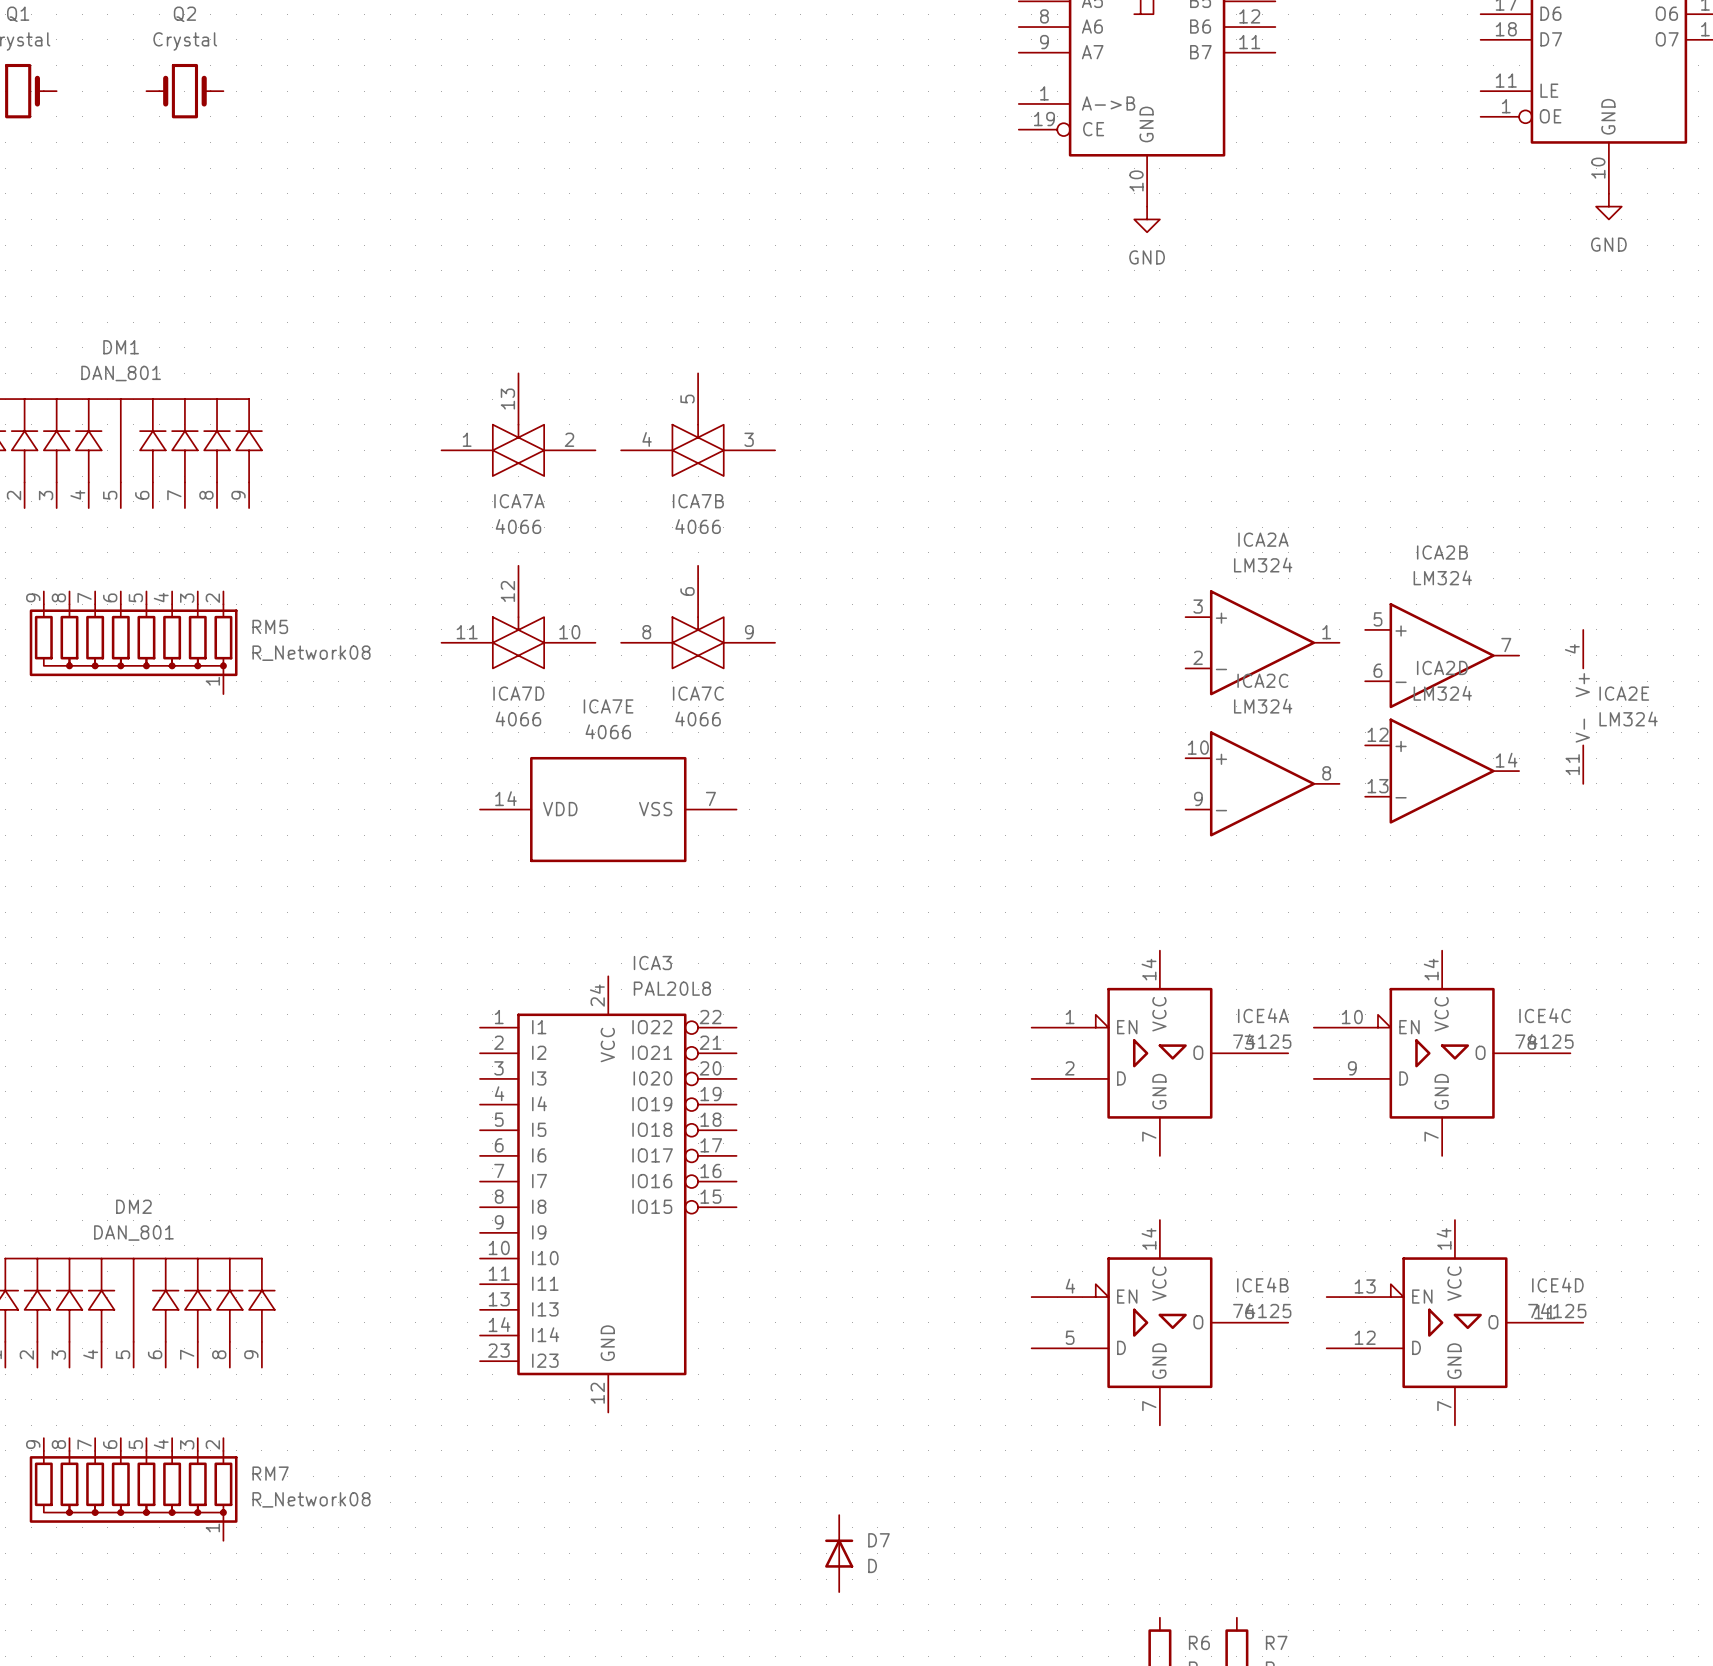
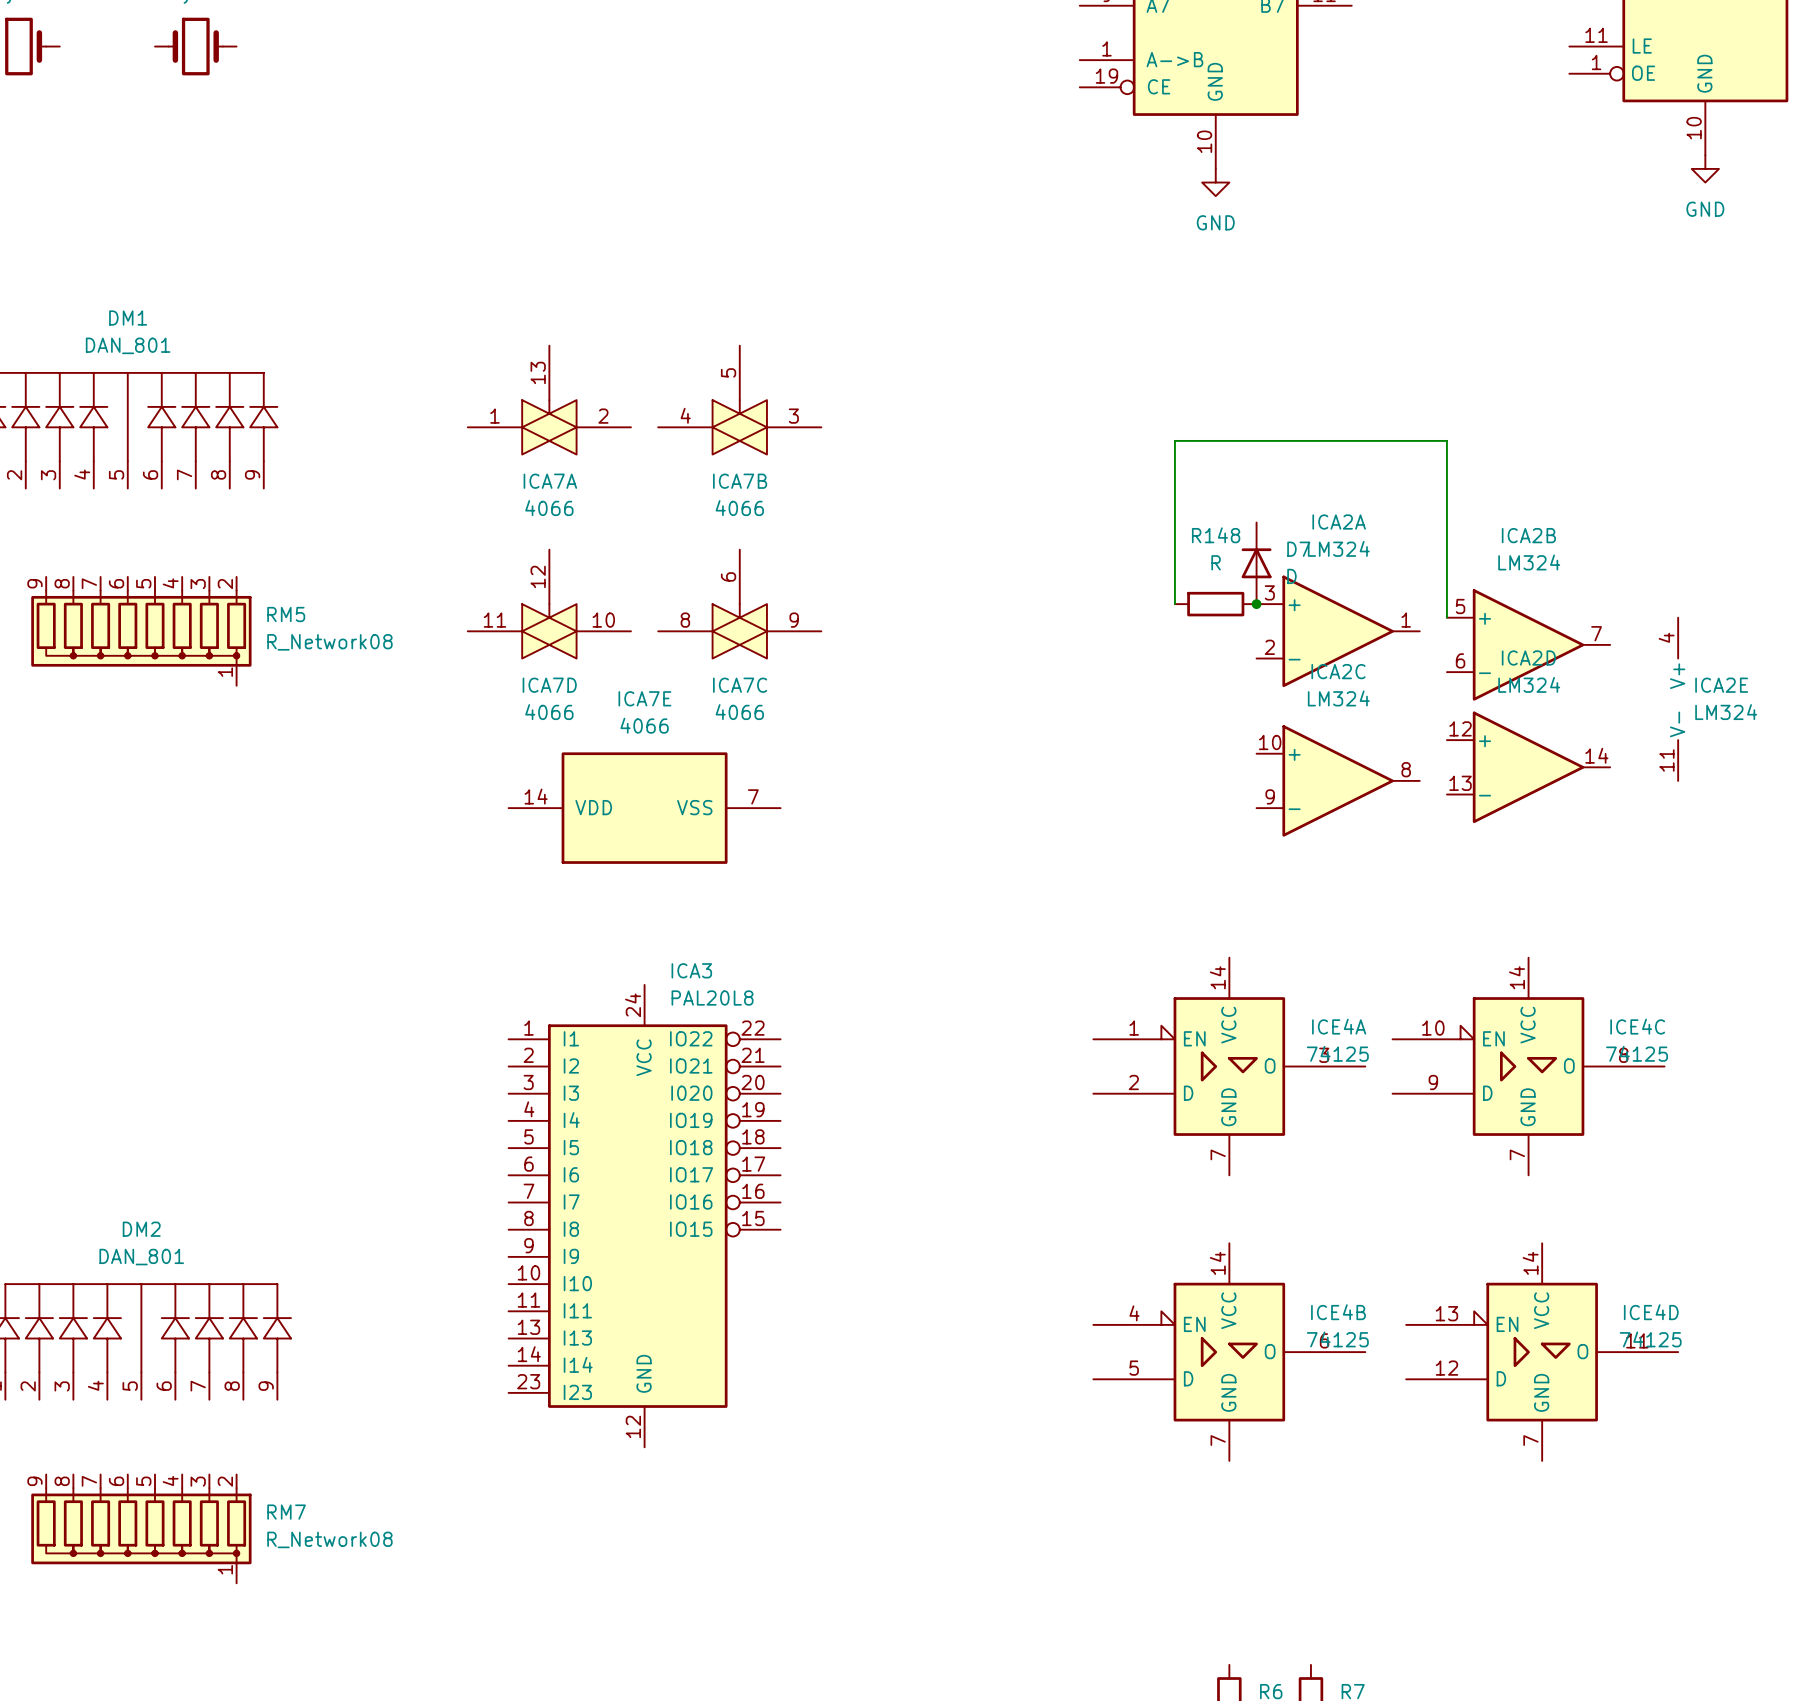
wire: none -> (1174, 604) (1174, 440) (1446, 440) (1446, 617)
R148: none -> R (1215, 604)
junction: none -> (1256, 604)
D7 position: (839, 1553) -> (1256, 563)

